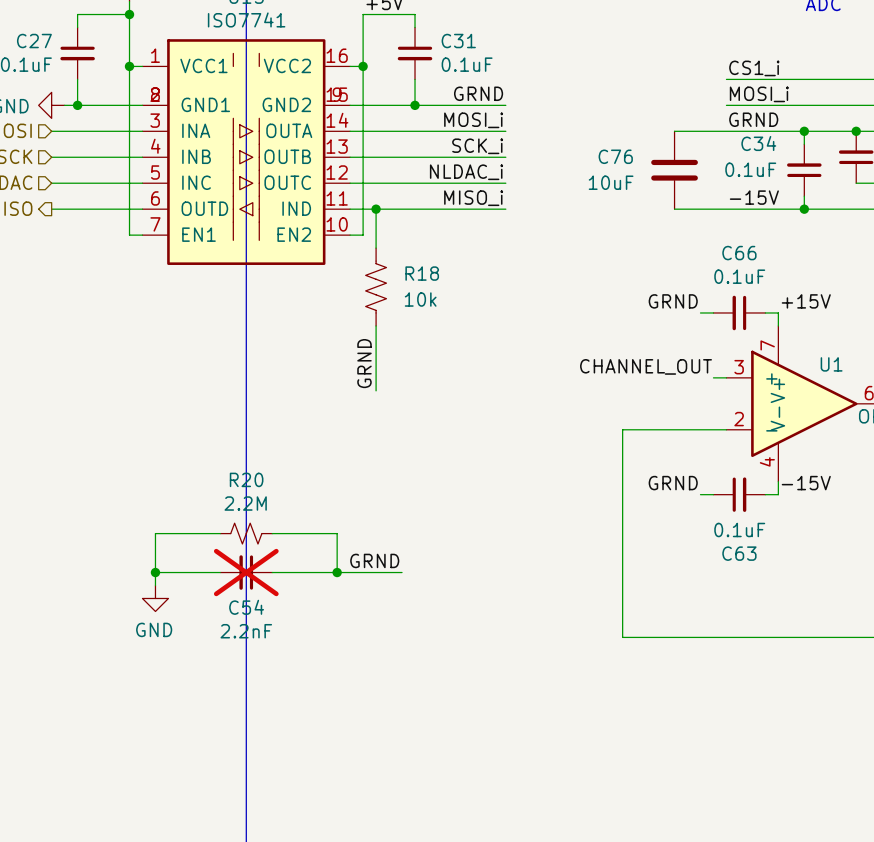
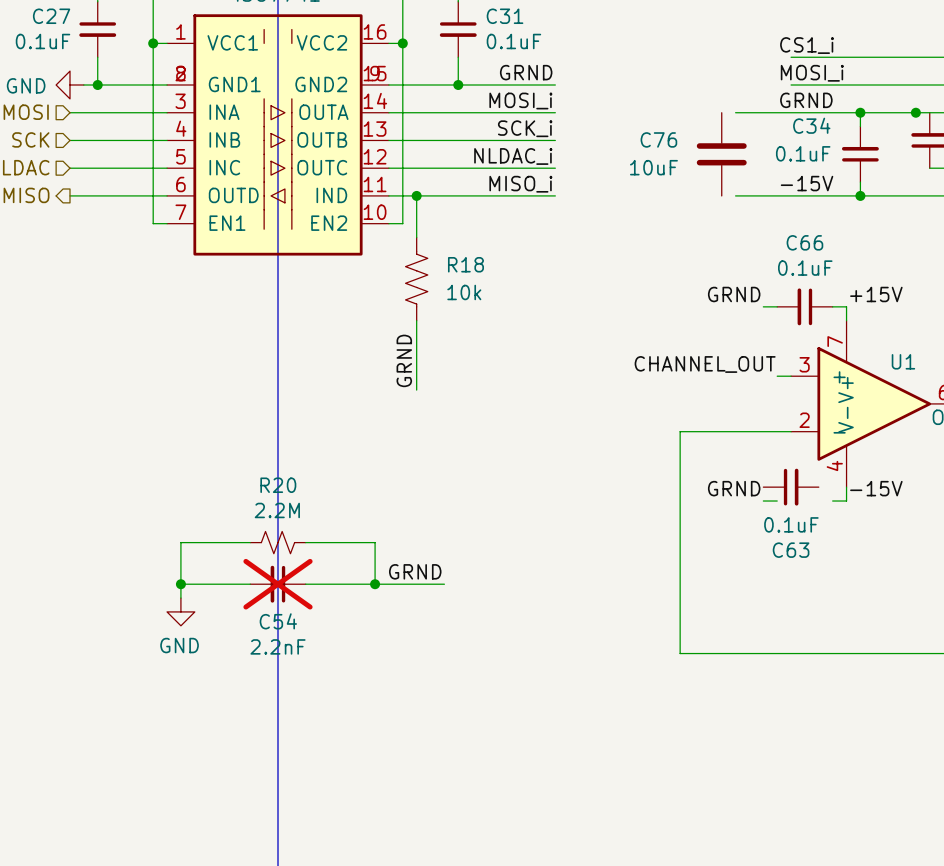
label position: CS1_i (754, 68) -> CS1_i (807, 45)
label position: MOSI_i (759, 94) -> MOSI_i (812, 73)
label position: GRND (753, 119) -> GRND (806, 100)
wire: (804, 131) (804, 144) -> (860, 112) (860, 126)
junction position: (804, 131) -> (860, 112)
junction position: (856, 131) -> (915, 112)
C76 position: (674, 170) -> (721, 154)
C34 position: (804, 170) -> (860, 154)
wire: (804, 196) (804, 209) -> (860, 182) (860, 195)
label position: -15V (754, 197) -> -15V (807, 183)
junction position: (804, 209) -> (860, 195)
C63 position: (739, 494) -> (791, 487)

